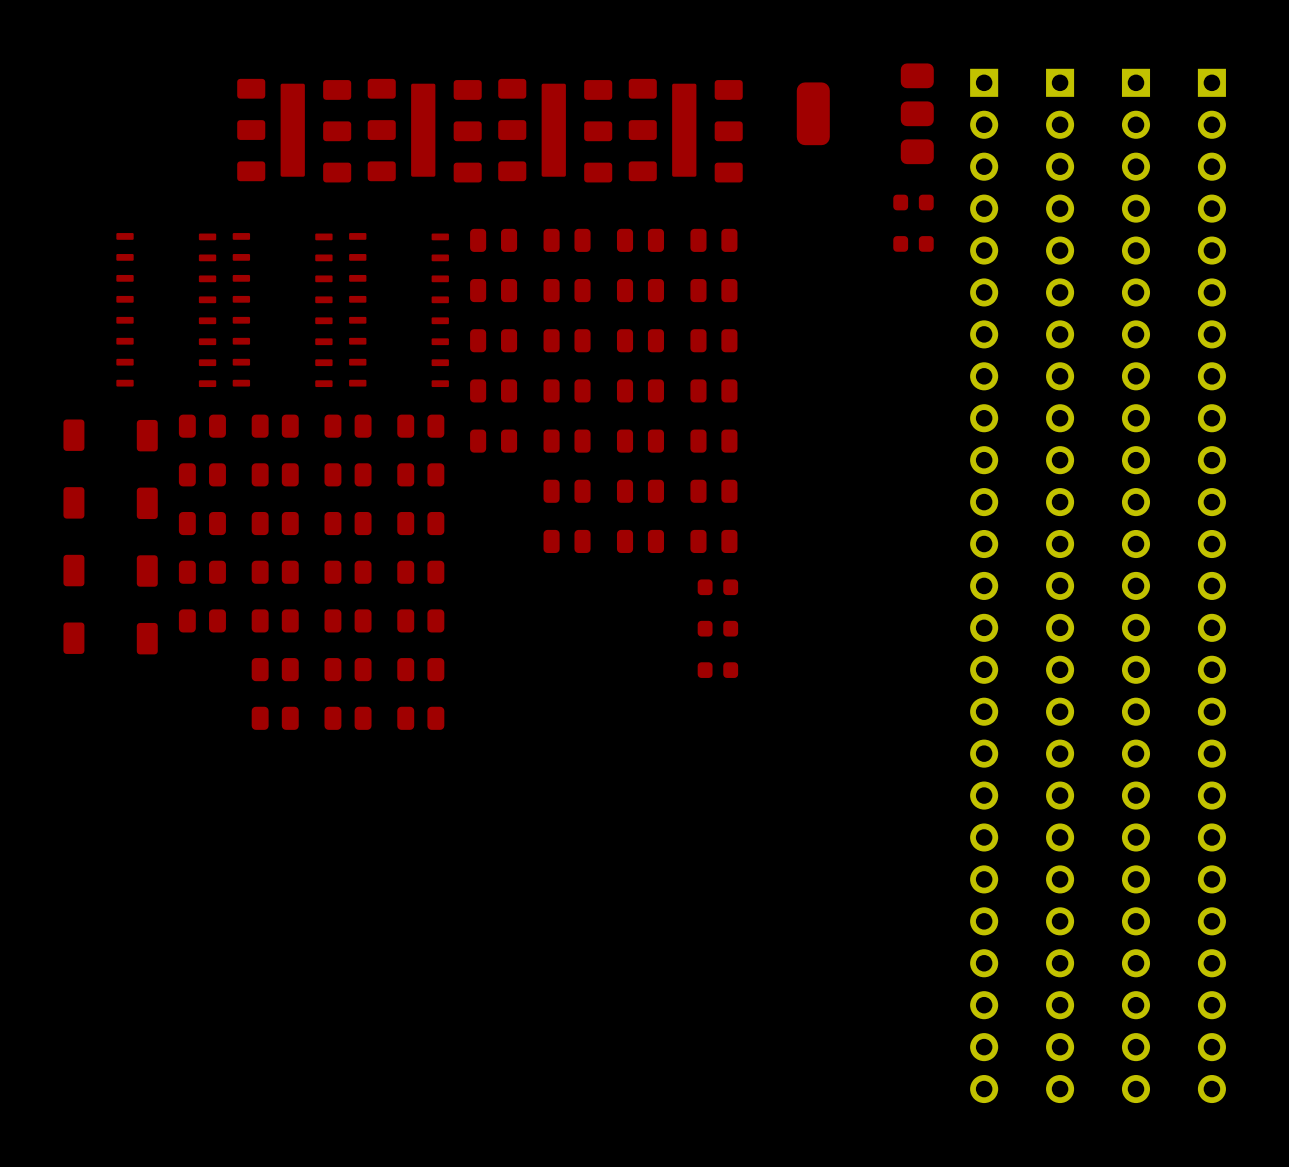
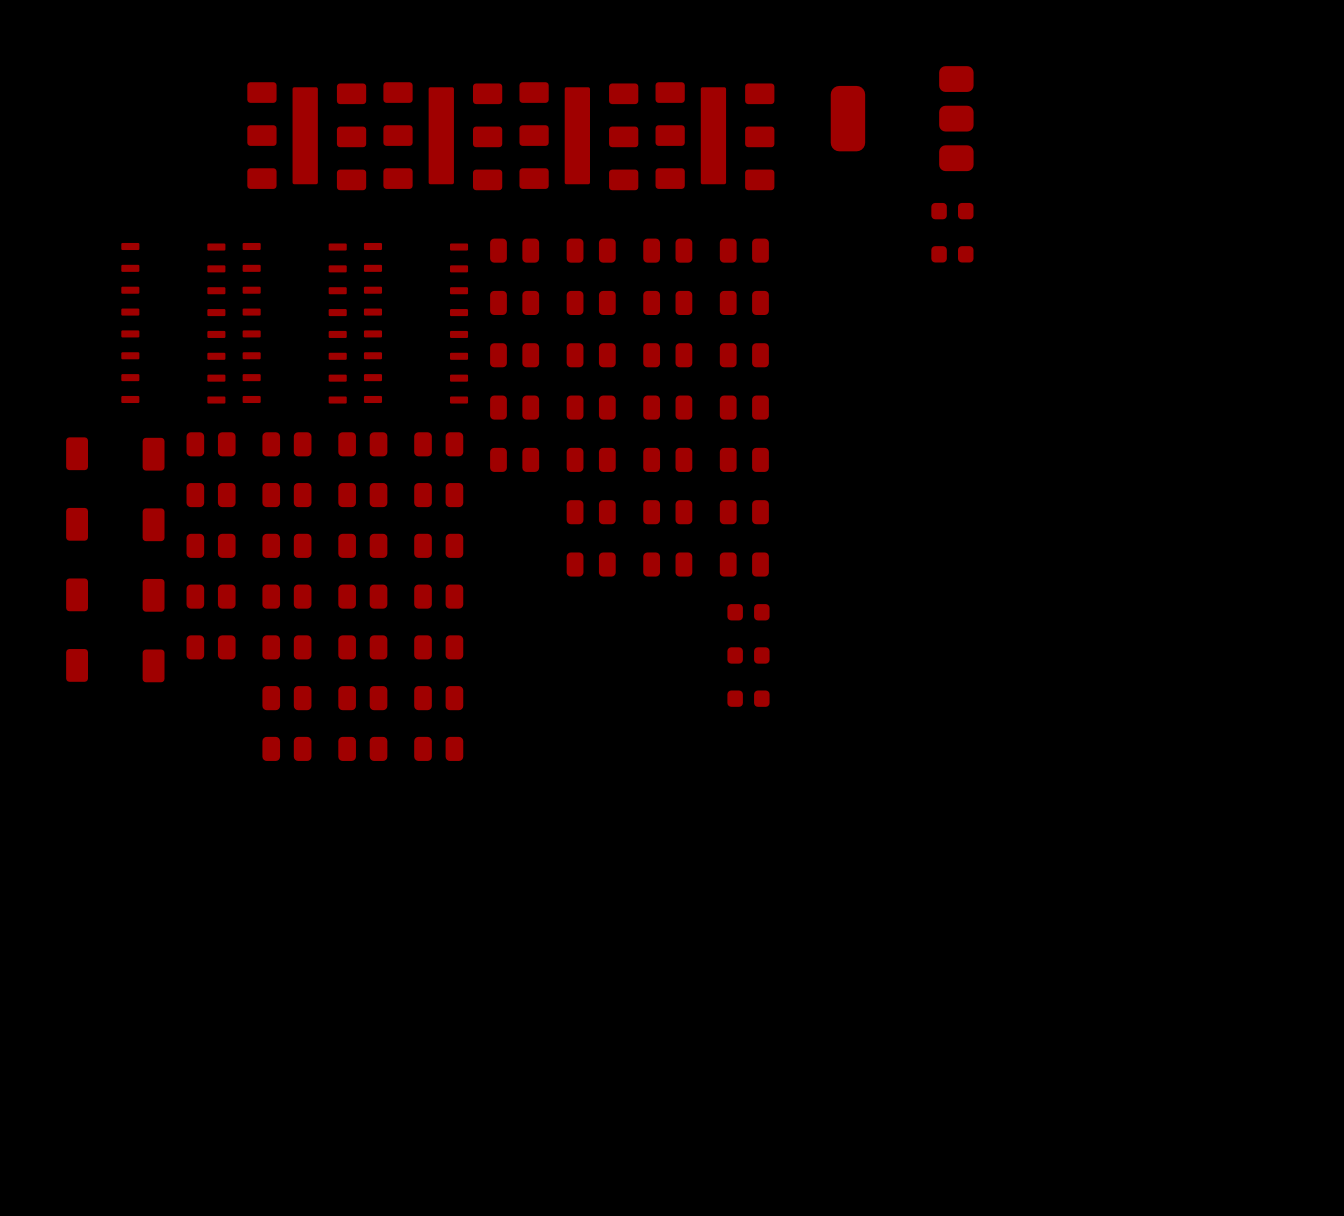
part: (984, 585) -> none
part: (1060, 585) -> none
part: (1135, 585) -> none
part: (1211, 585) -> none

